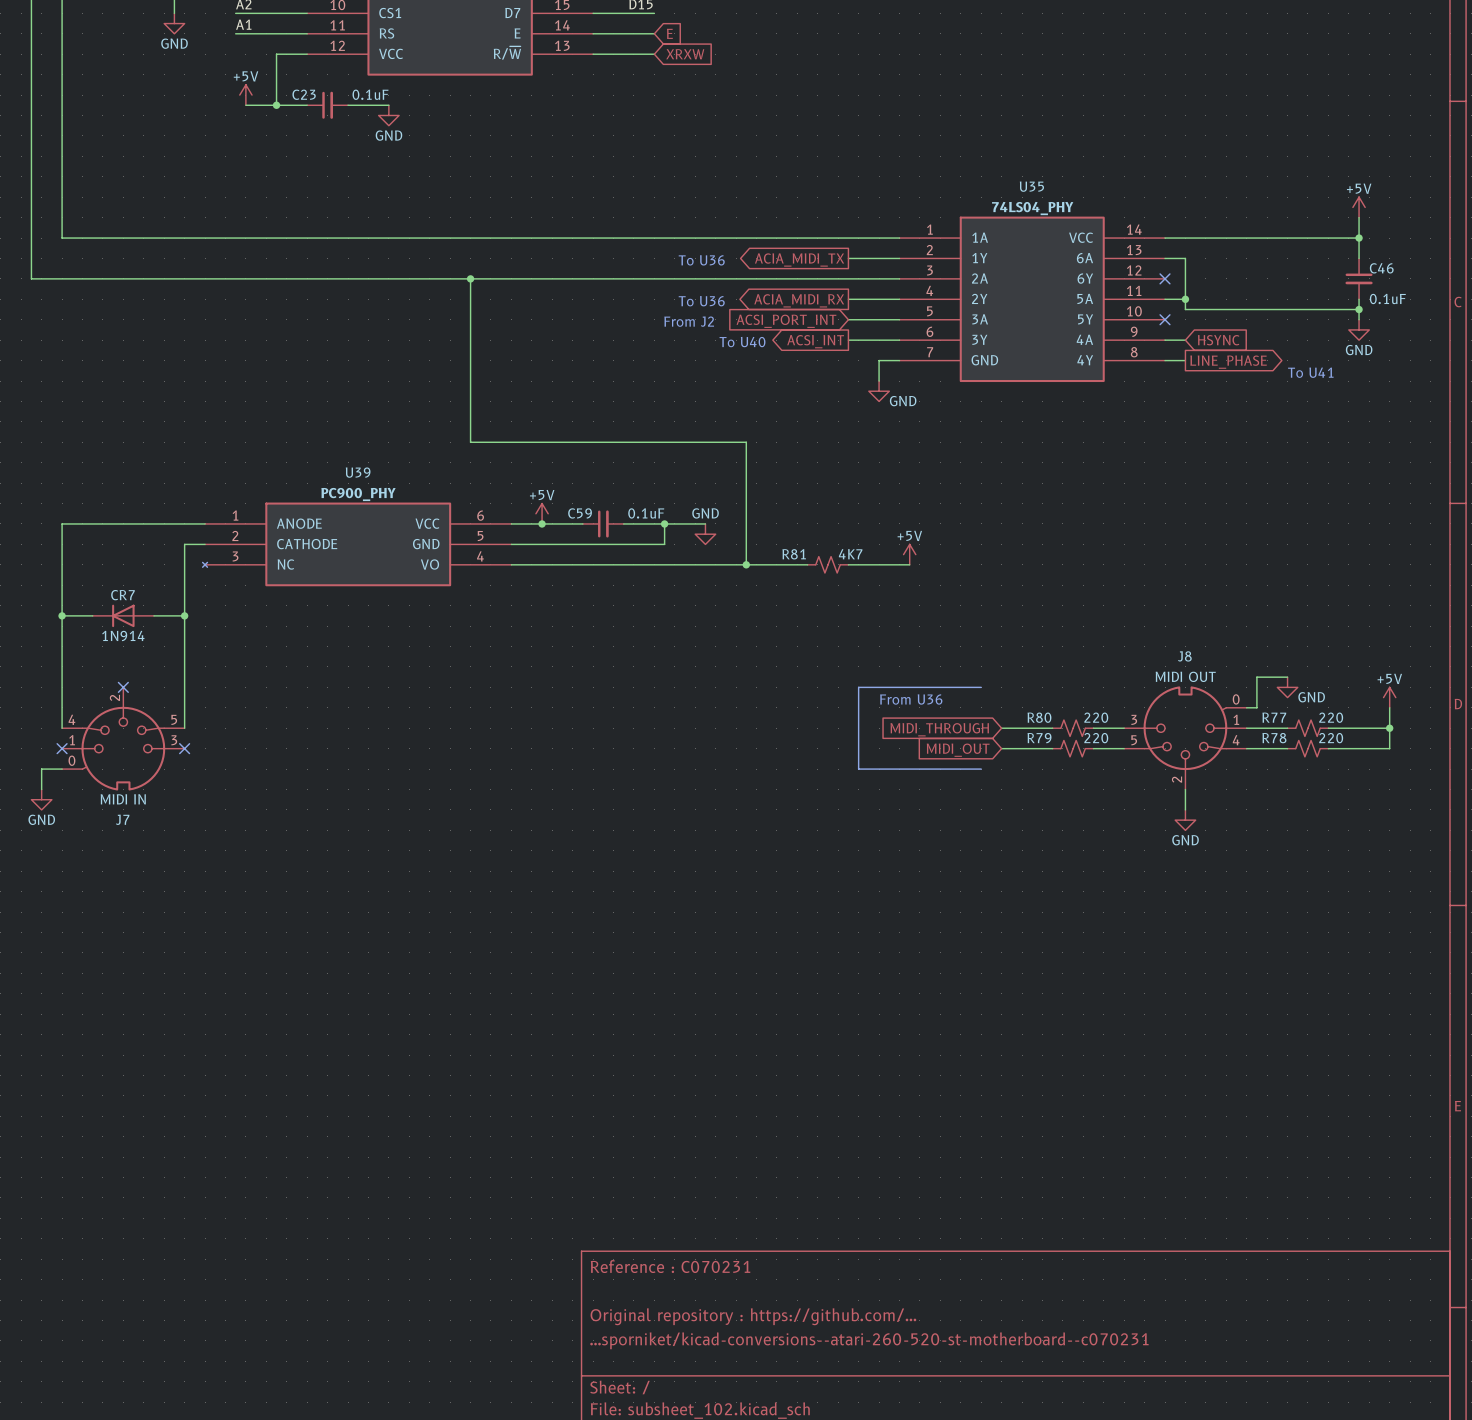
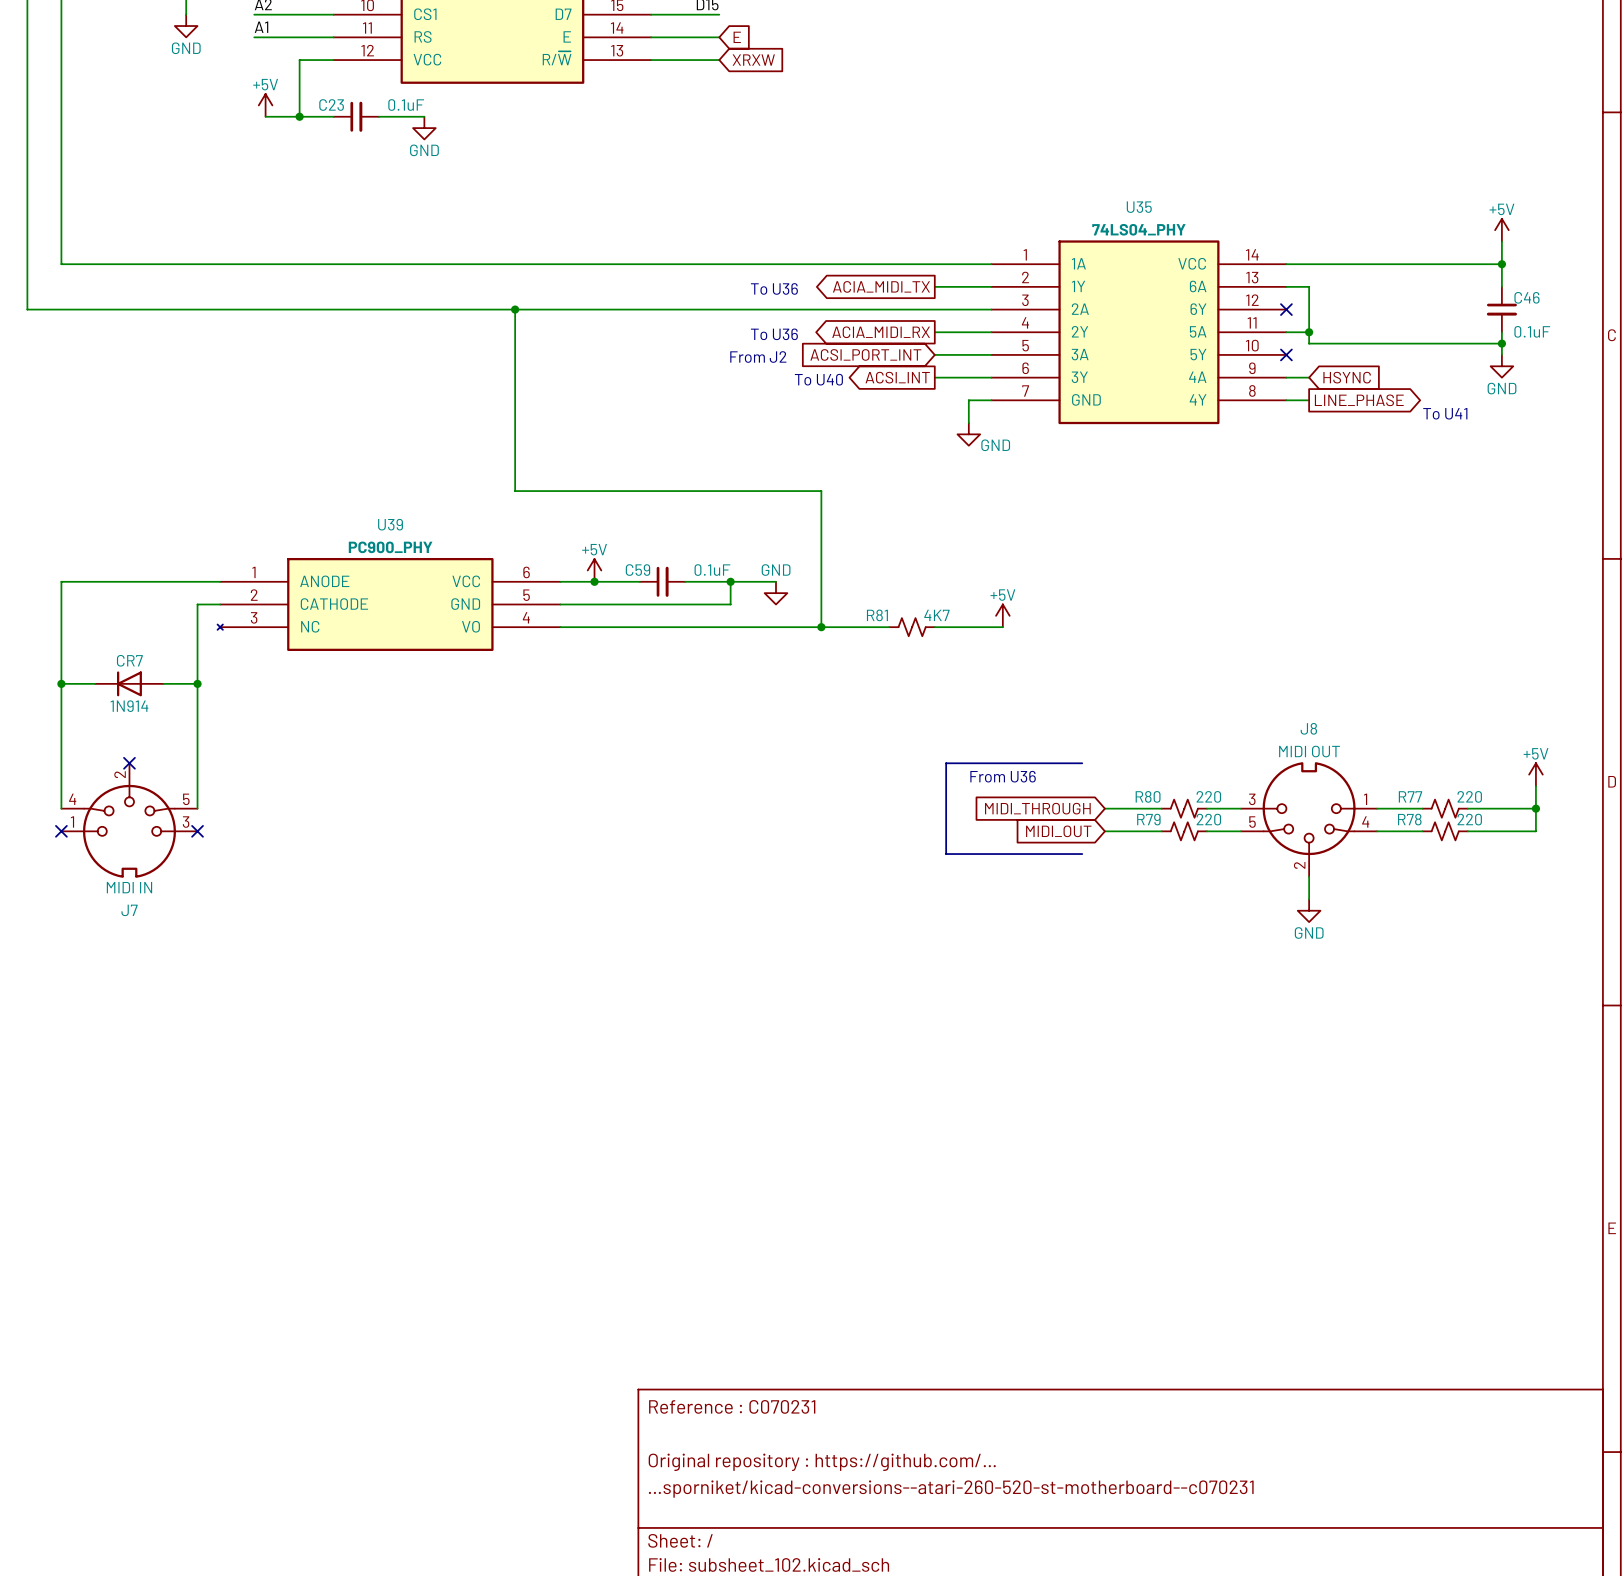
wire: (1287, 677) (1256, 677) (1256, 707) (1246, 707) -> none
J8 symbol: [1124, 686, 1247, 790] -> [1241, 762, 1378, 877]
J7 symbol: [62, 687, 185, 791] -> [61, 763, 198, 878]
power symbol: GND (1287, 687) -> none
wire: (62, 769) (41, 769) (41, 789) -> none
power symbol: GND (41, 799) -> none

